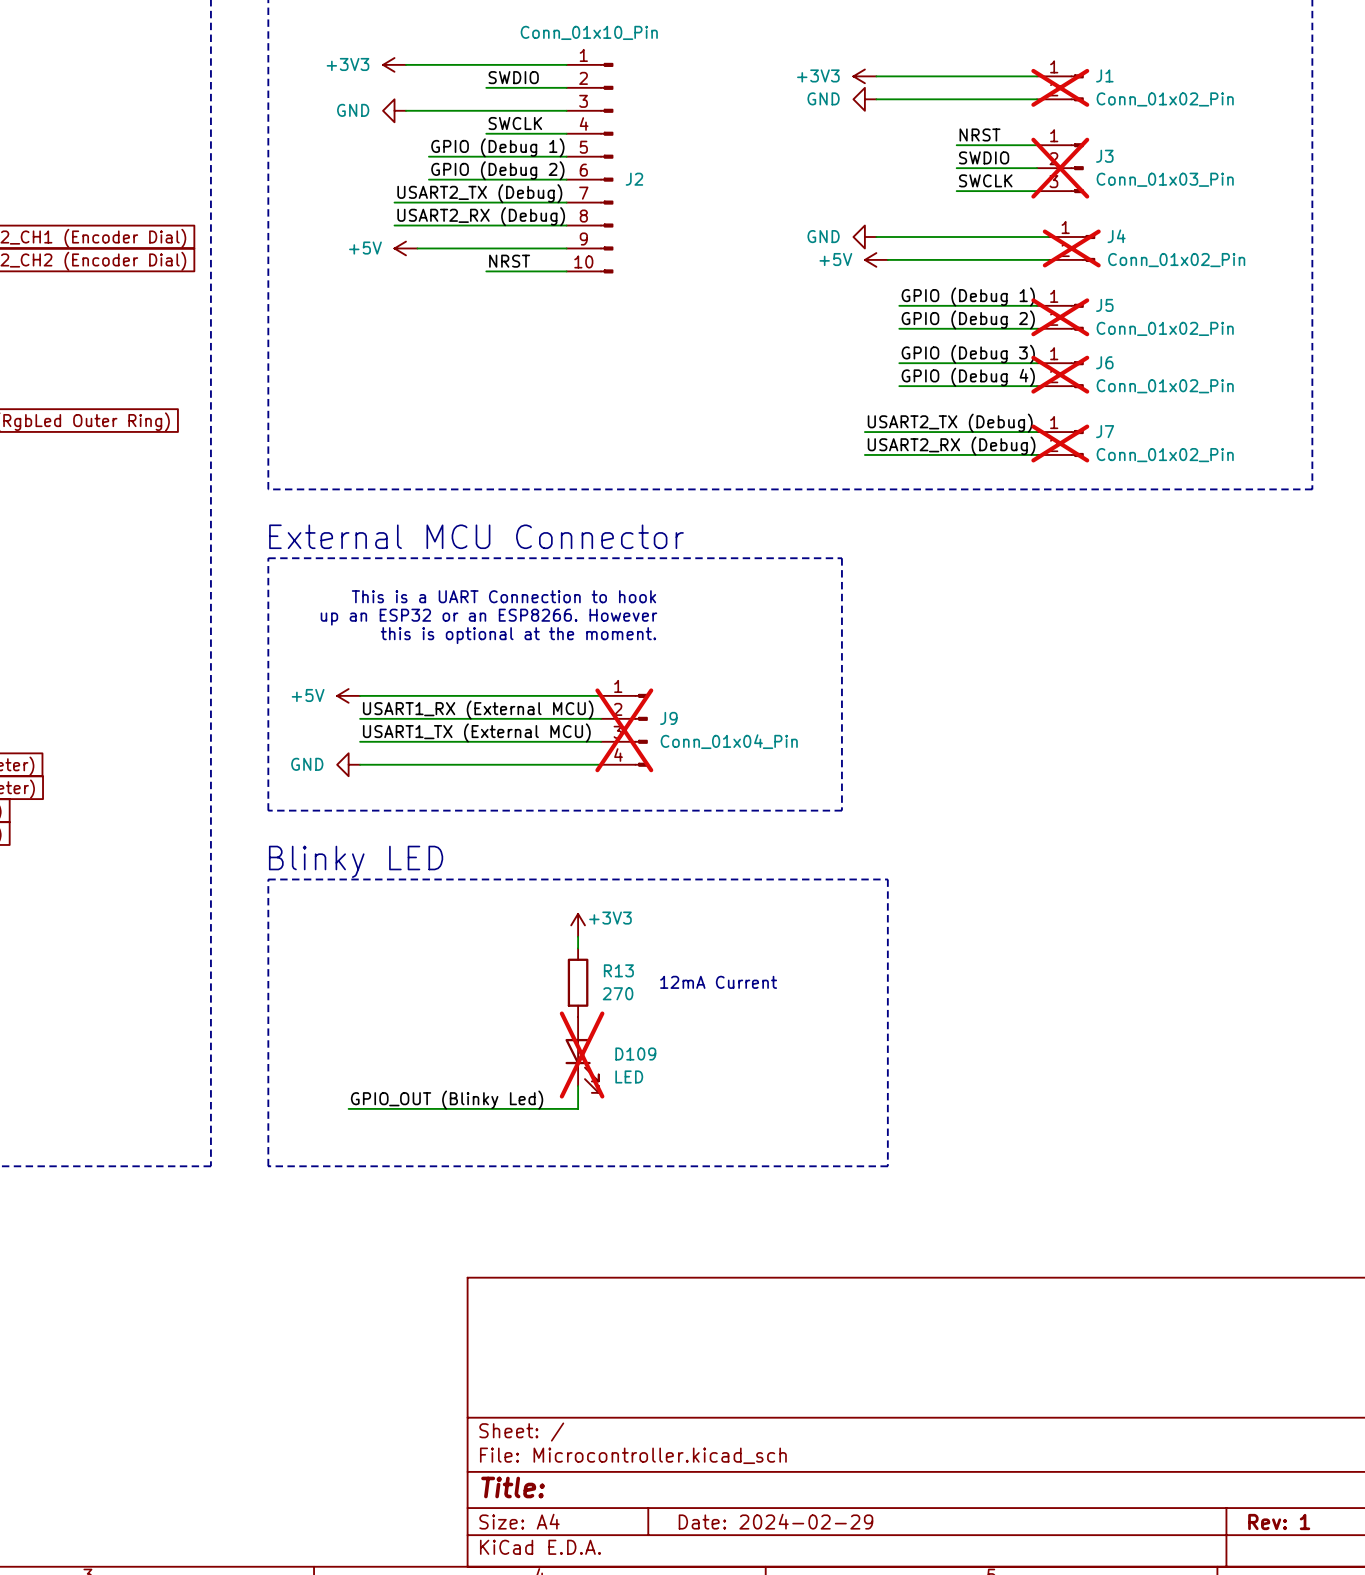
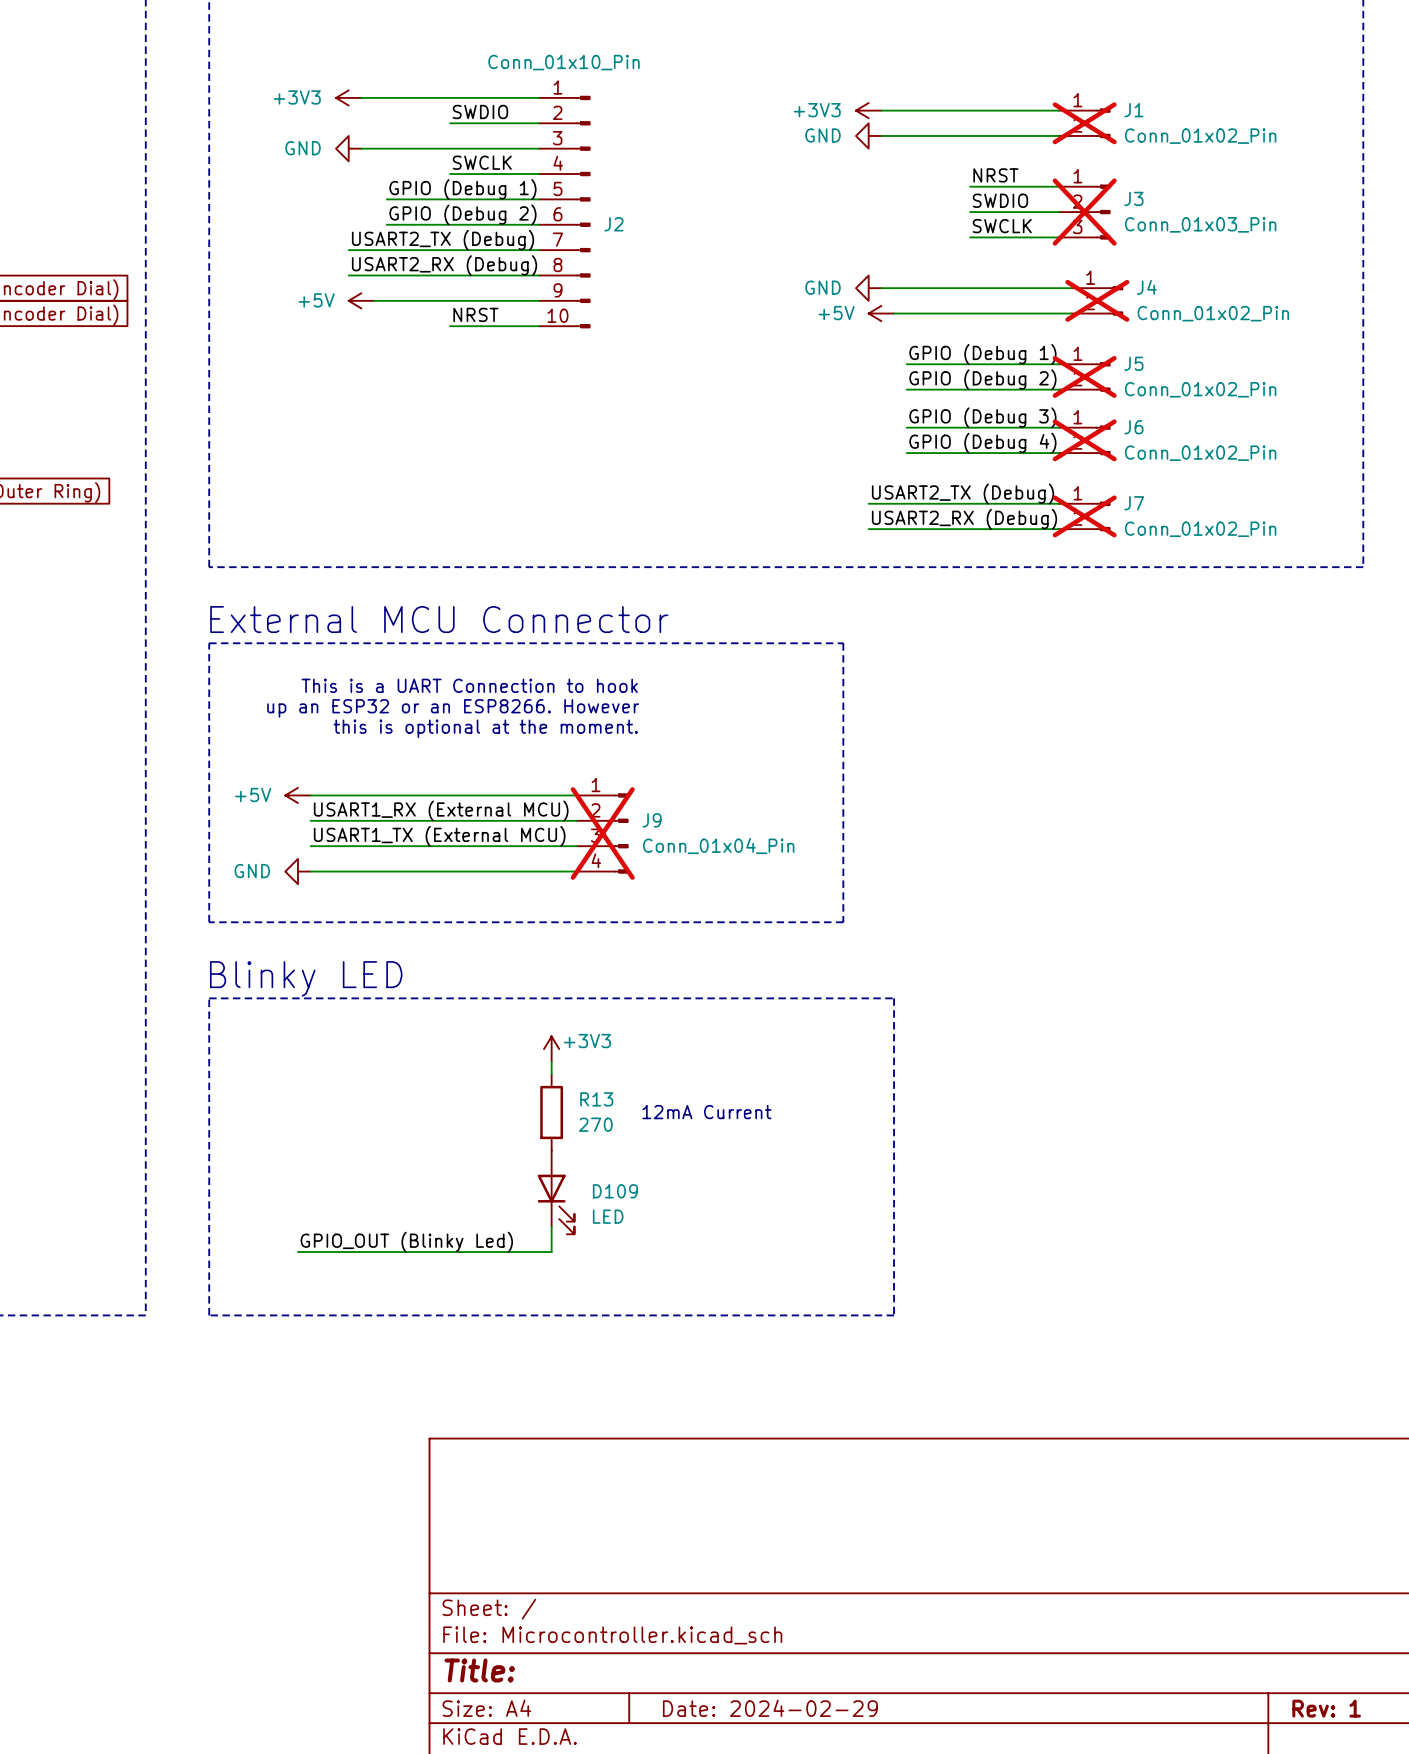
D109 do-not-place cross: (582, 1055) -> none

